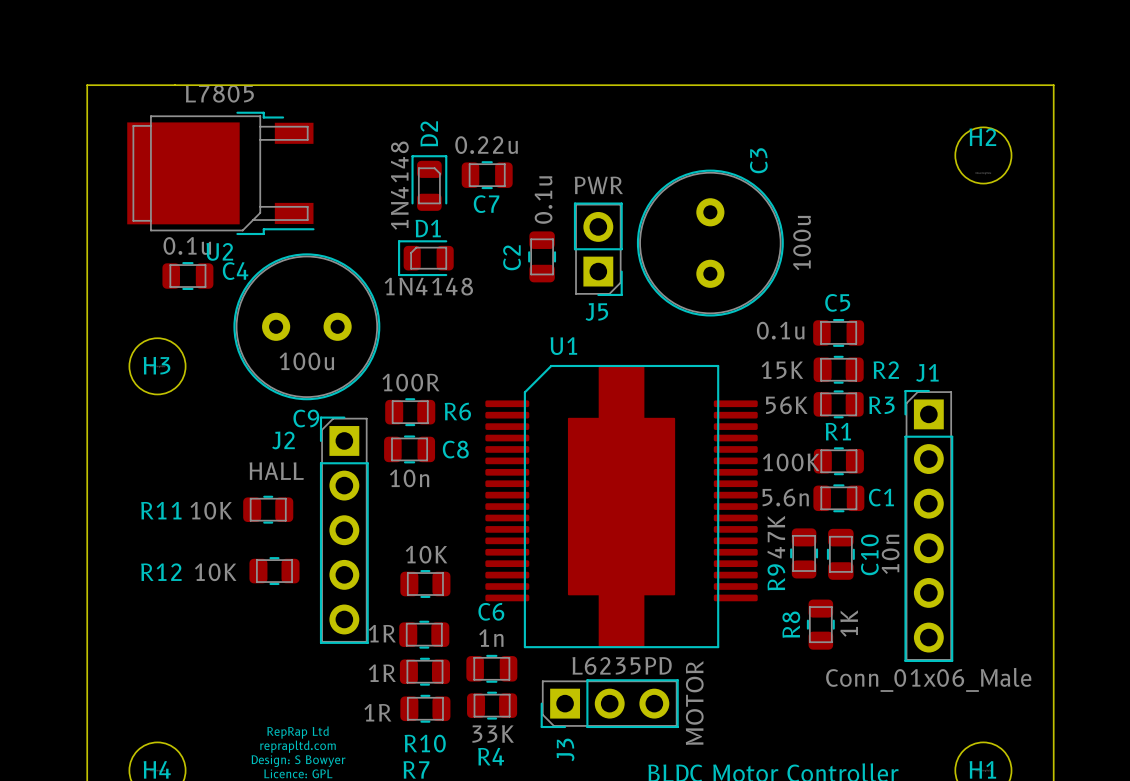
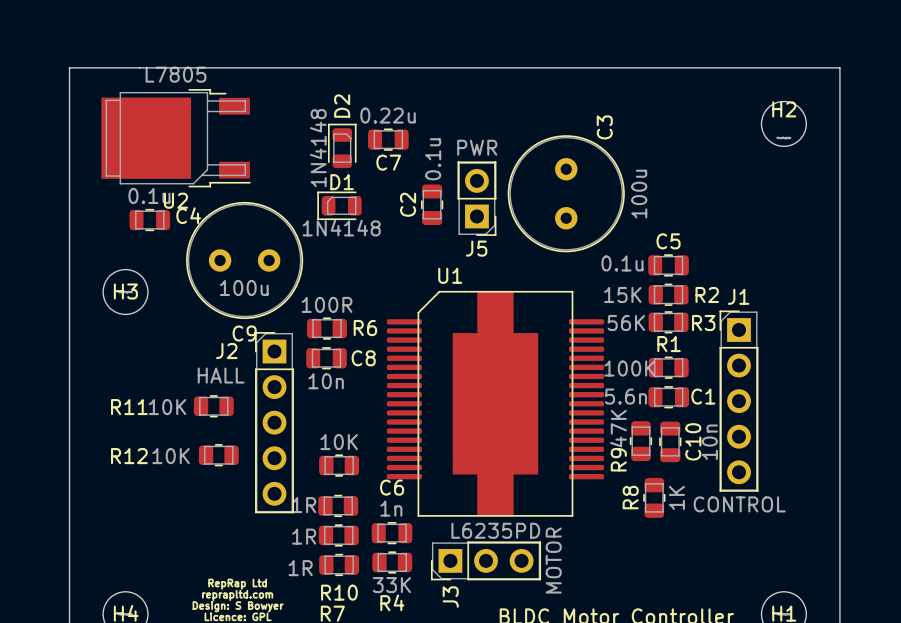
J1 footprint: [904, 389, 954, 662] -> [719, 310, 759, 492]
J1 value: Conn_01x06_Male (928, 679) -> CONTROL (739, 504)

